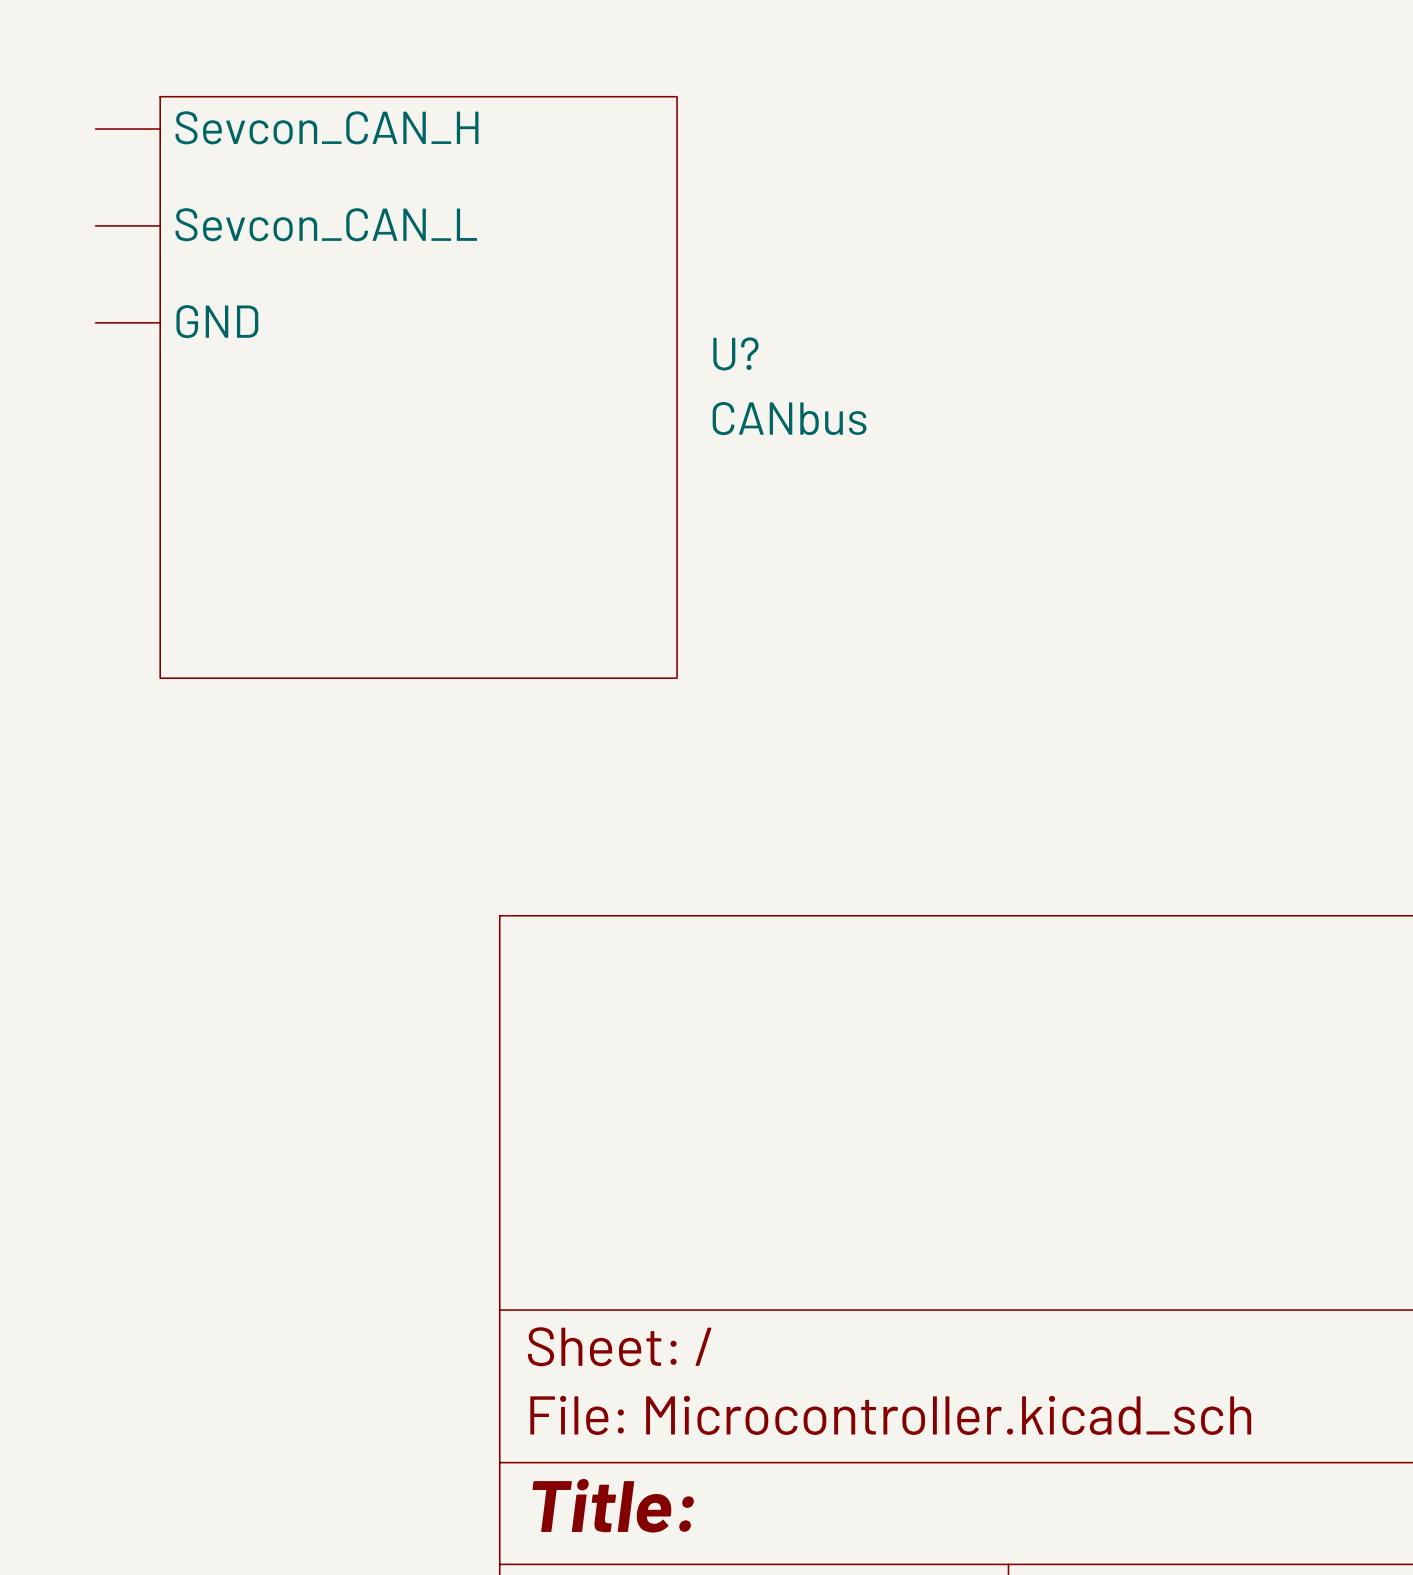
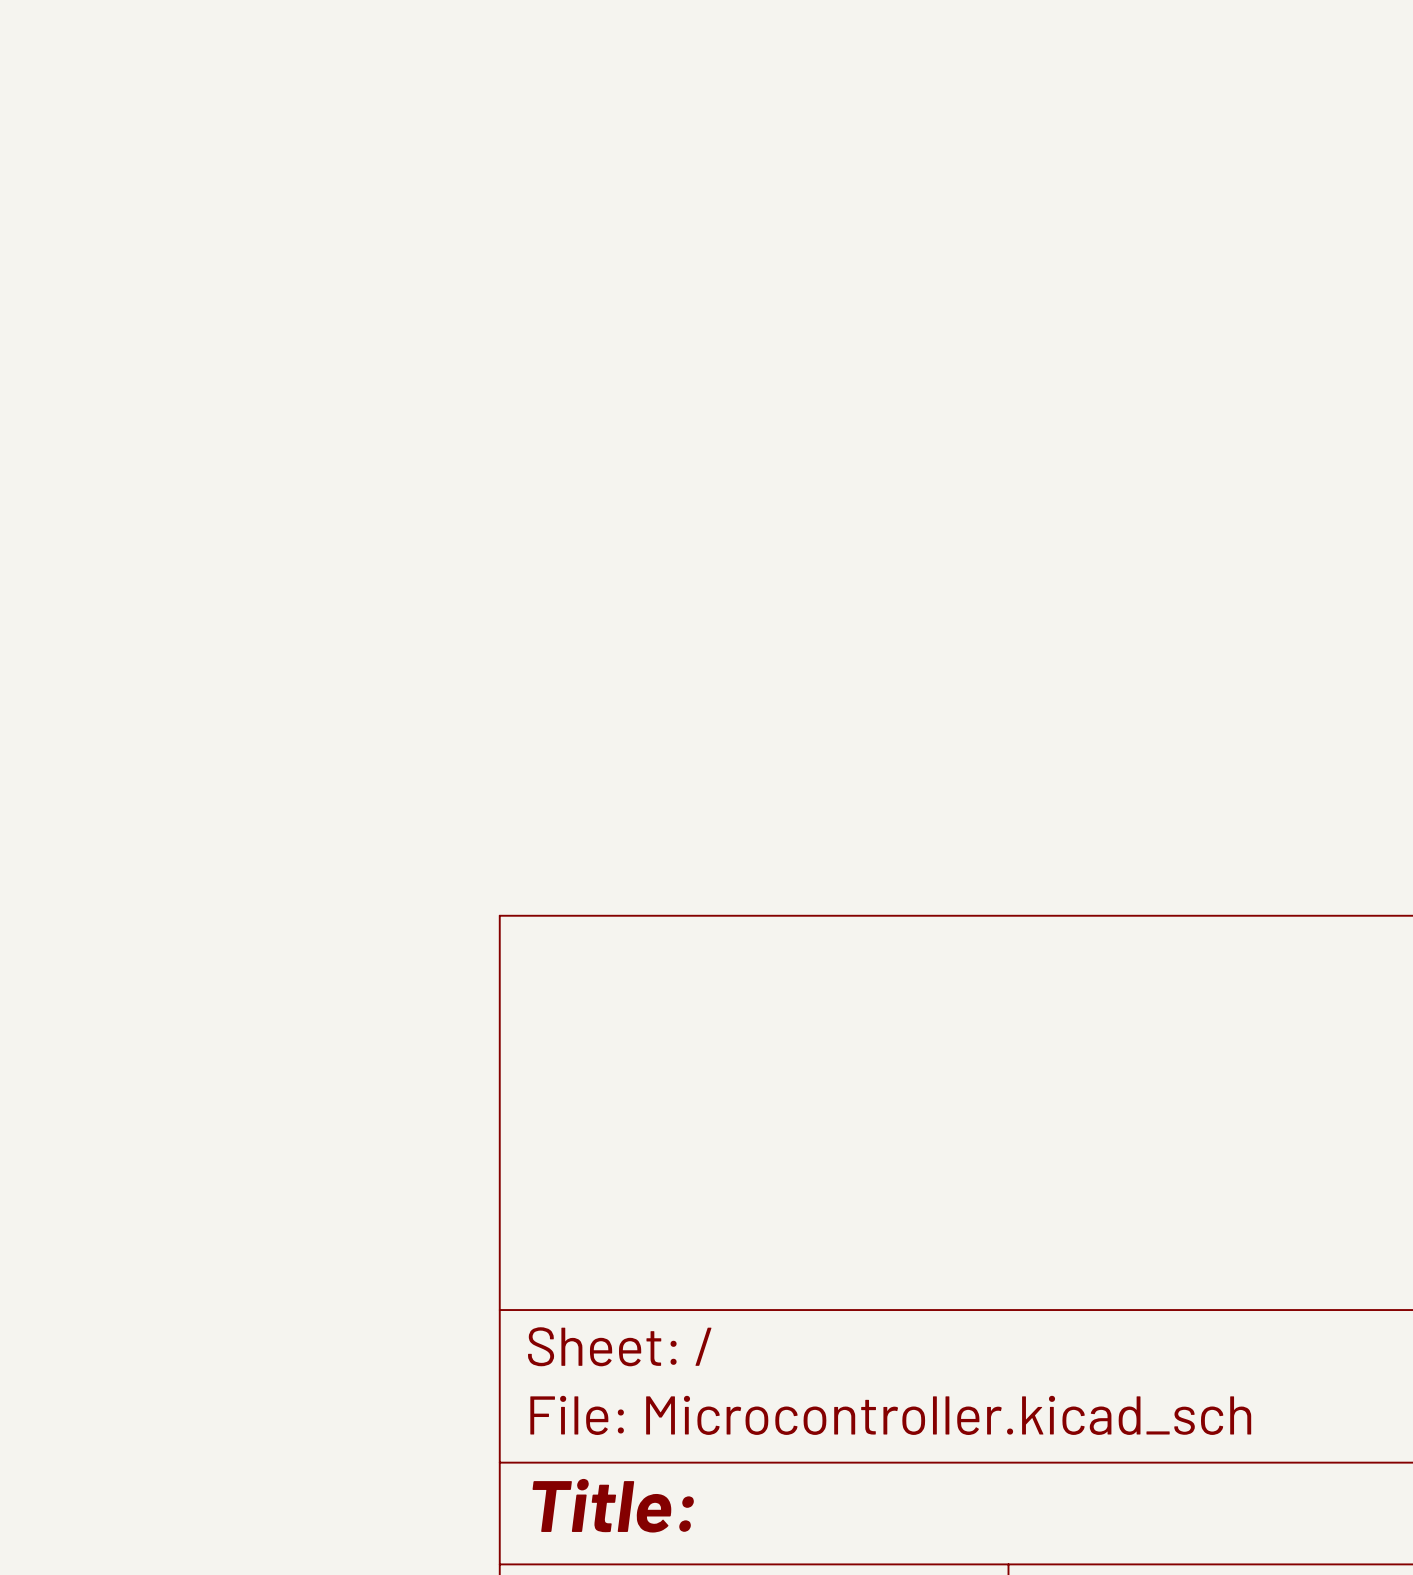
U?: CANbus (386, 387) -> none

